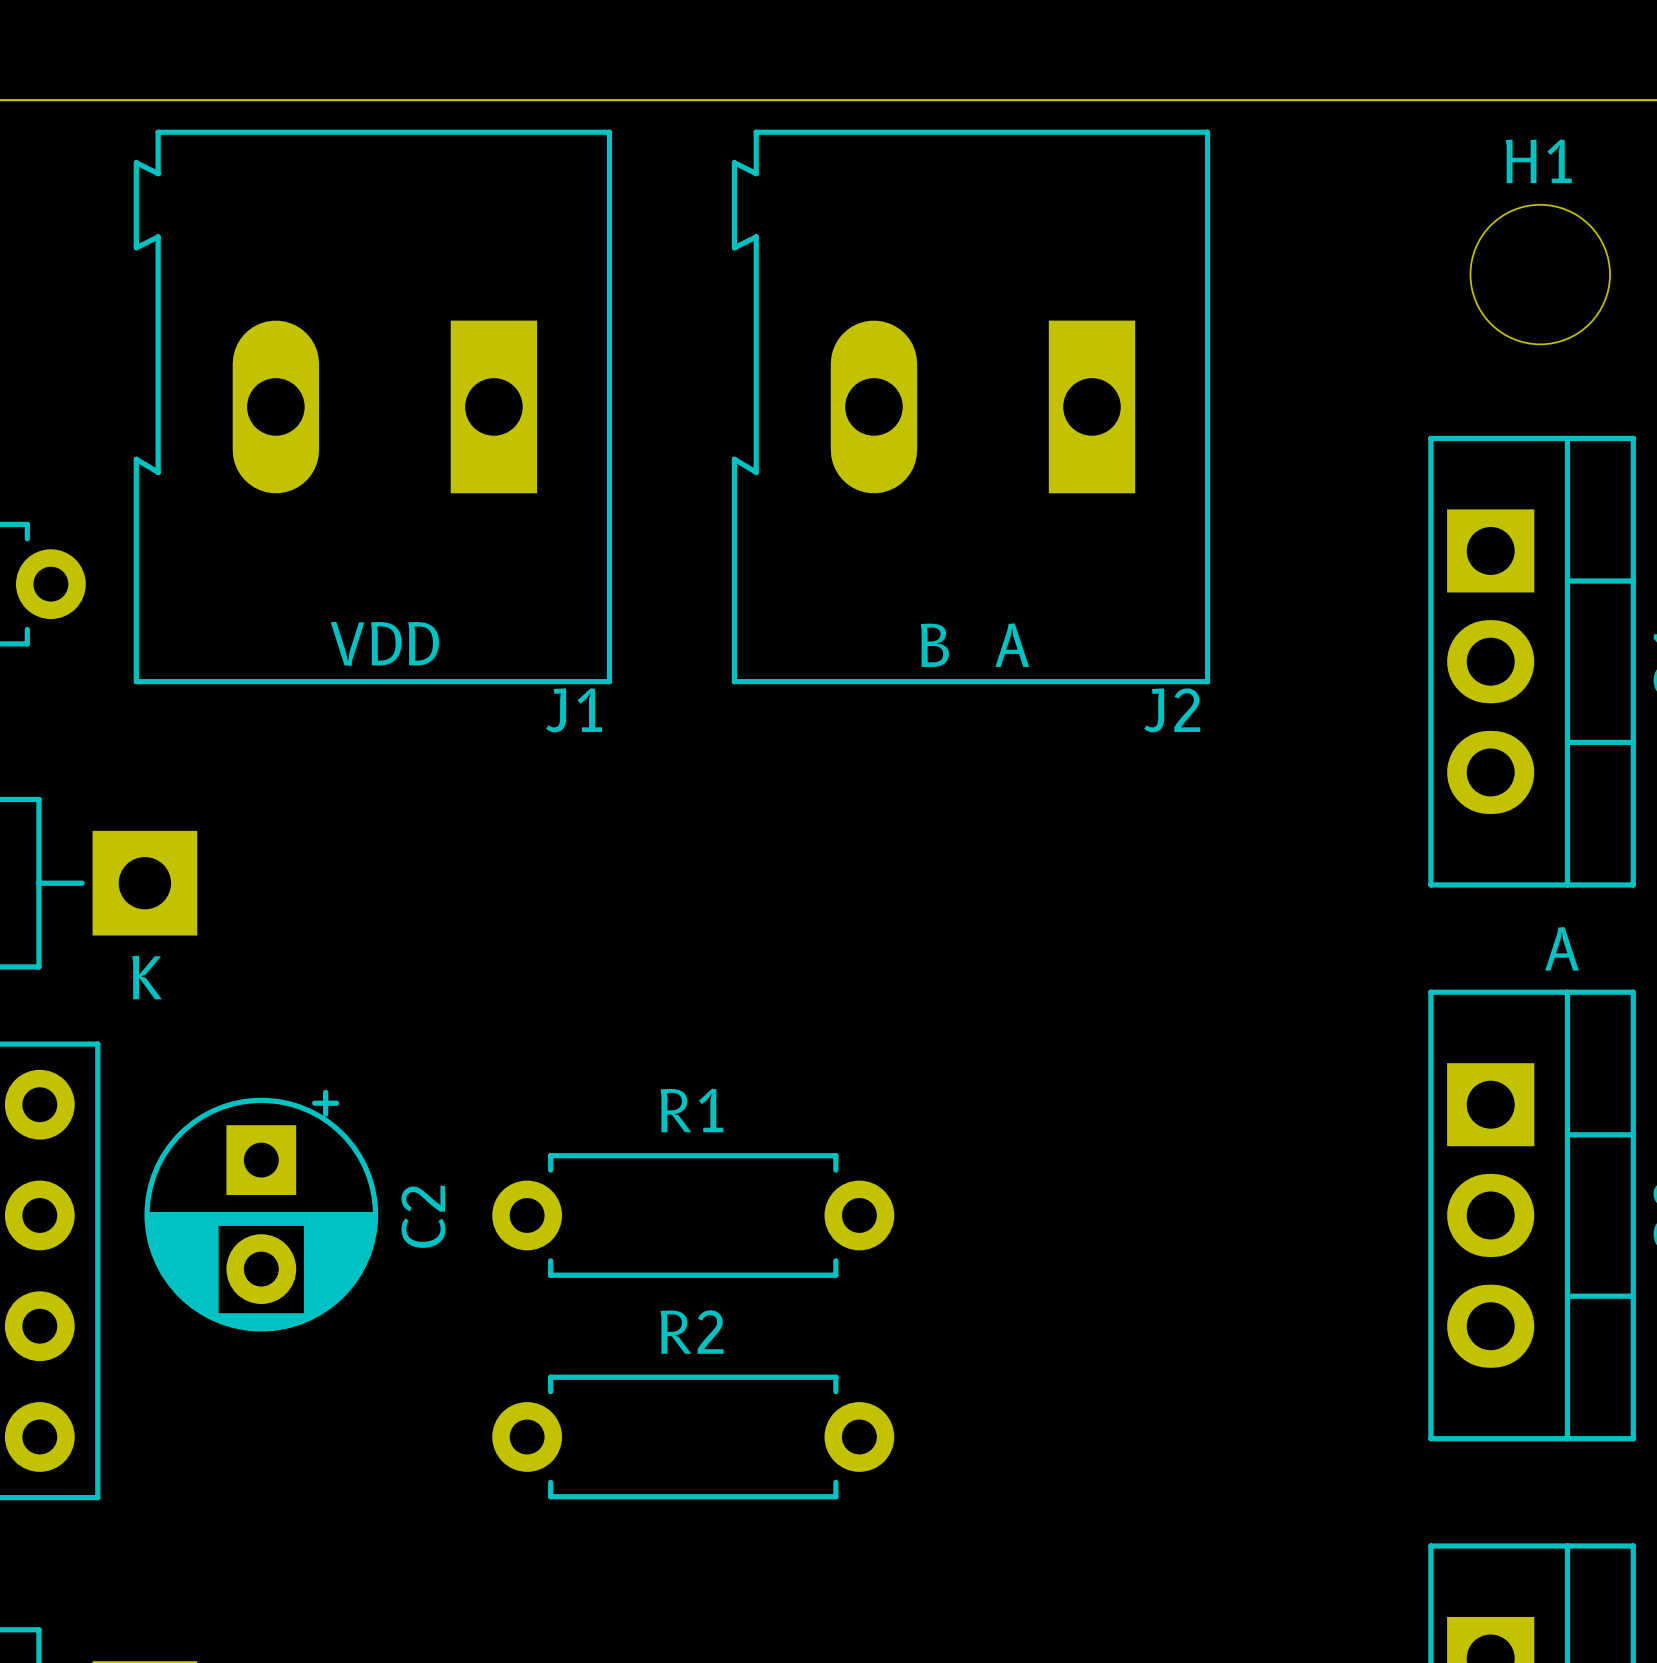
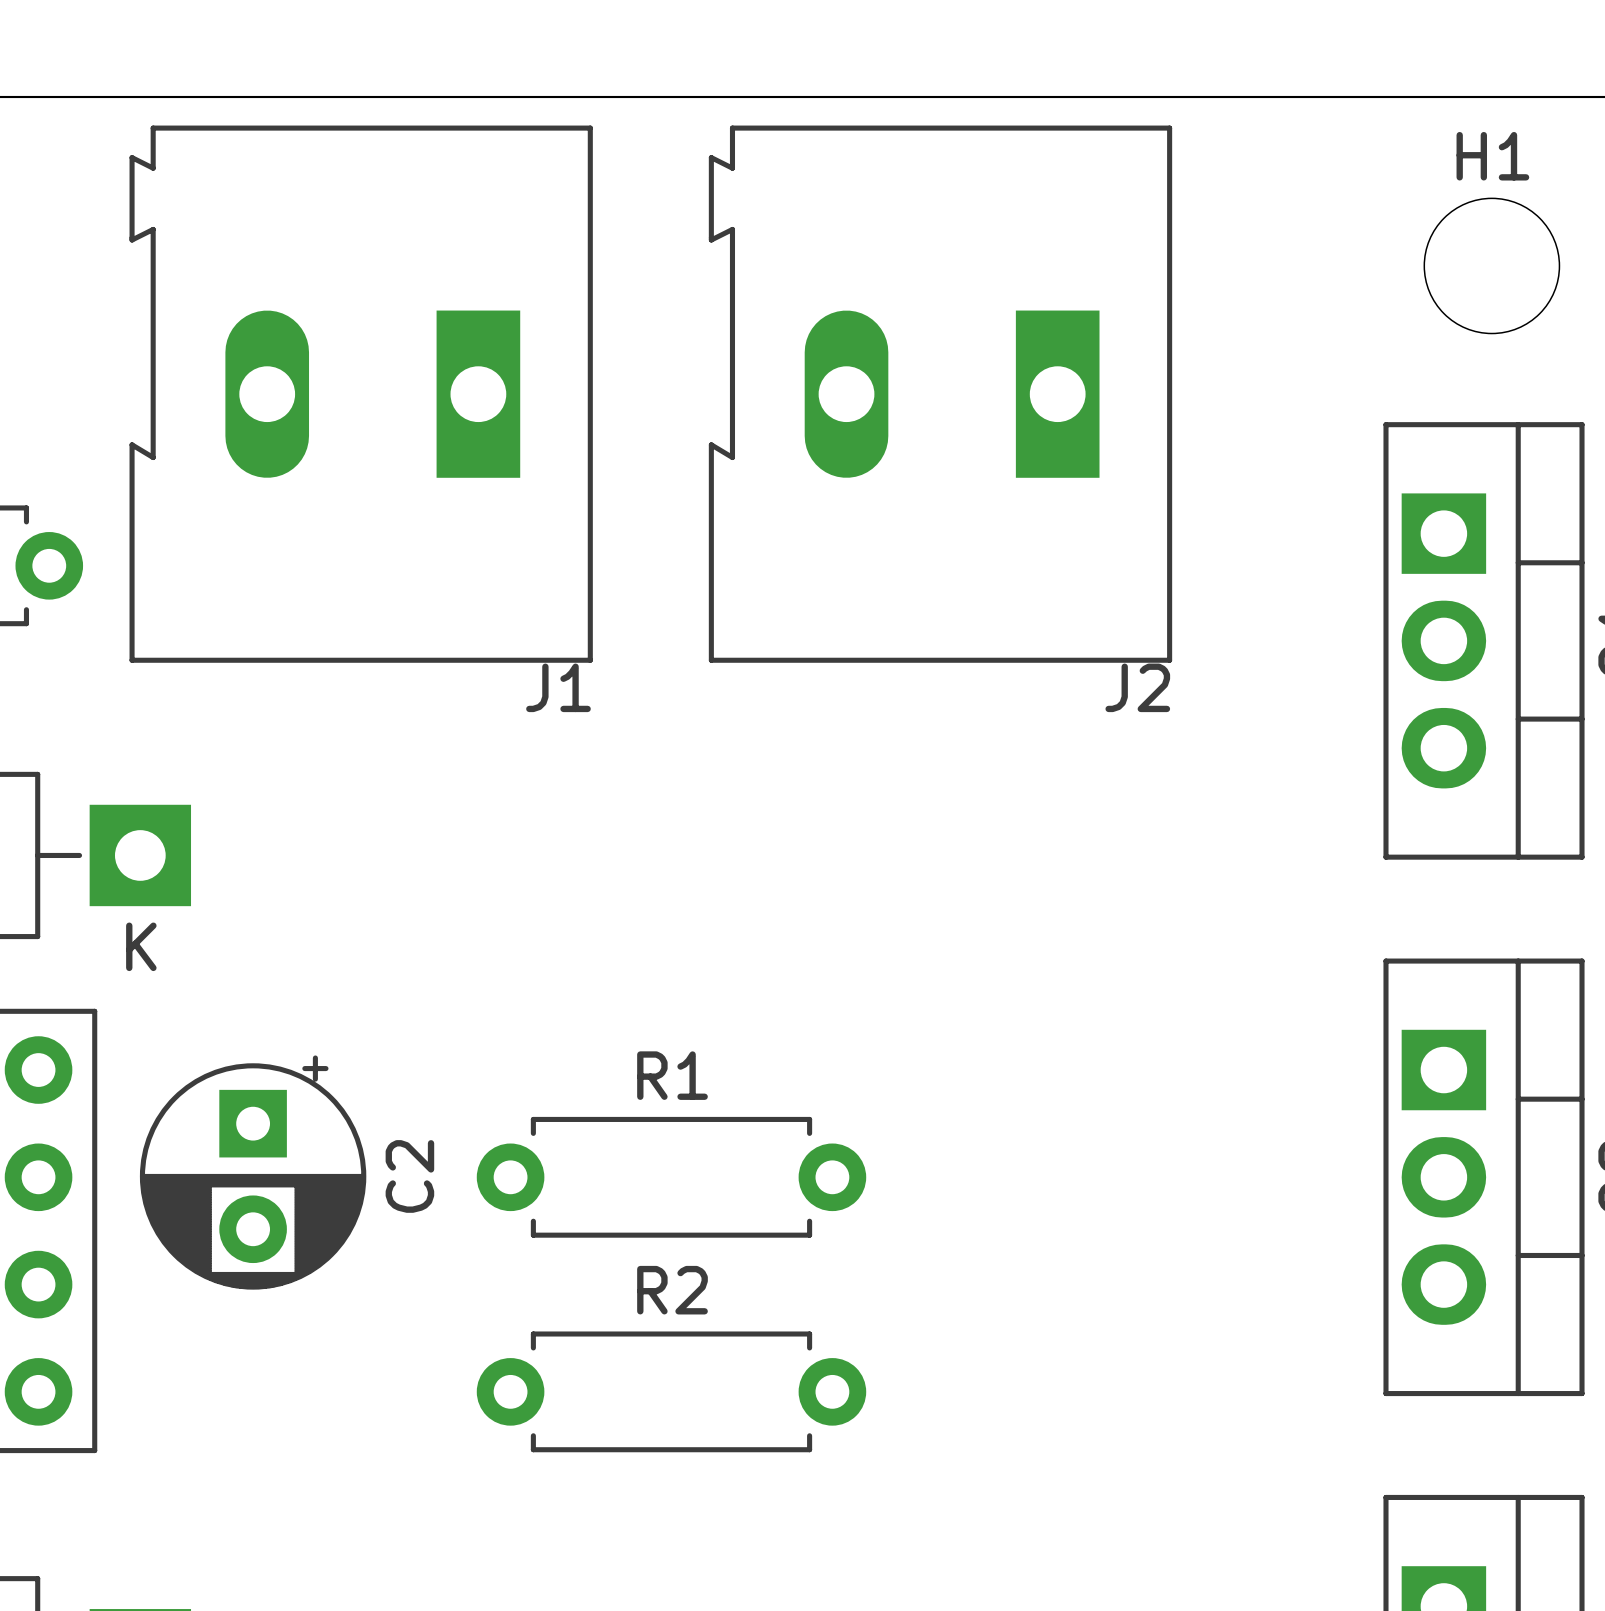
text: VDD (384, 643) -> none
text: B A (974, 645) -> none
text: A (1561, 948) -> none

